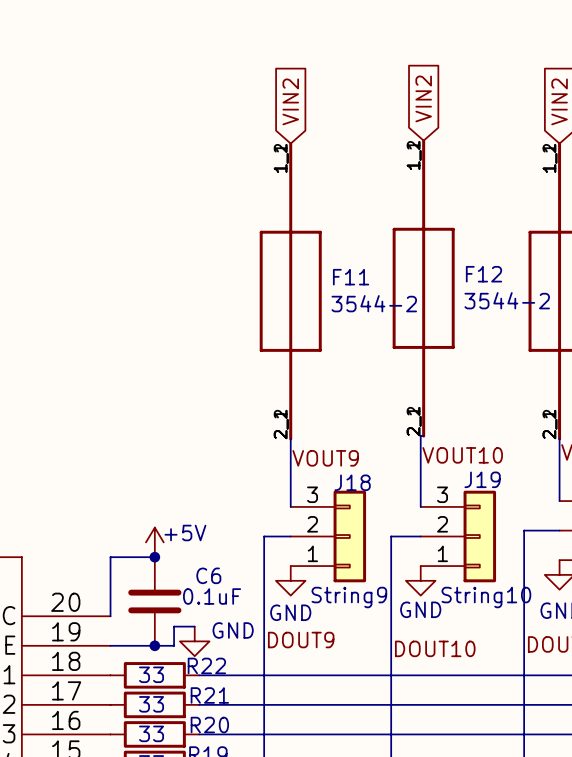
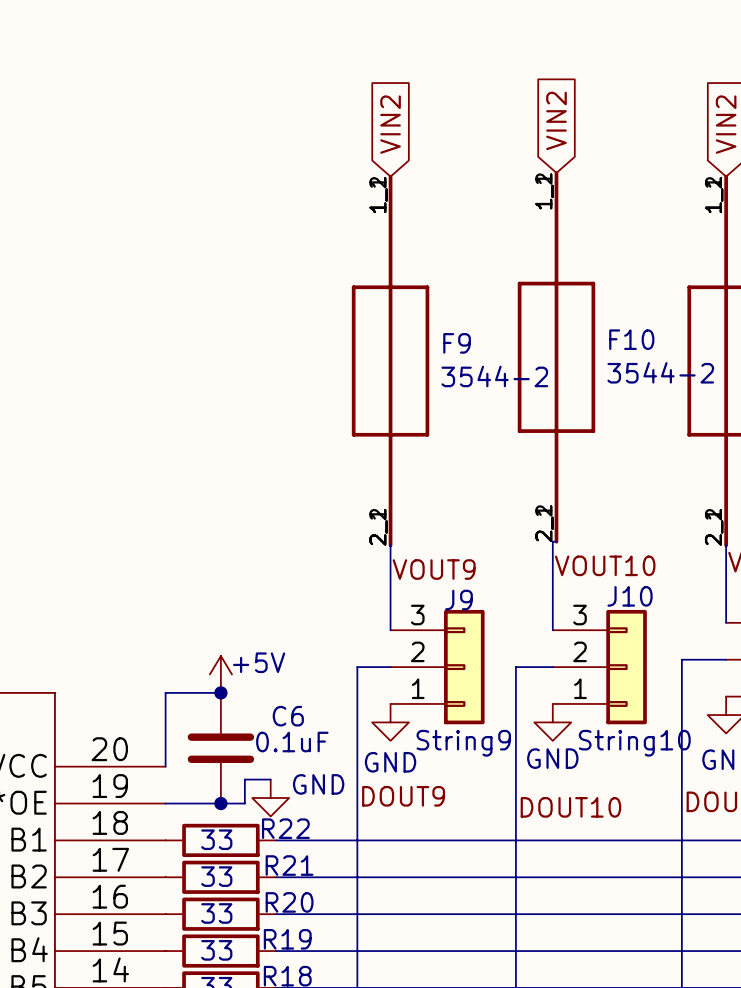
F12 name: F12 (483, 274) -> F10 (631, 339)
F11 name: F11 (351, 277) -> F9 (457, 343)
J19 name: J19 (482, 479) -> J10 (630, 596)
J18 name: J18 (352, 482) -> J9 (458, 600)

